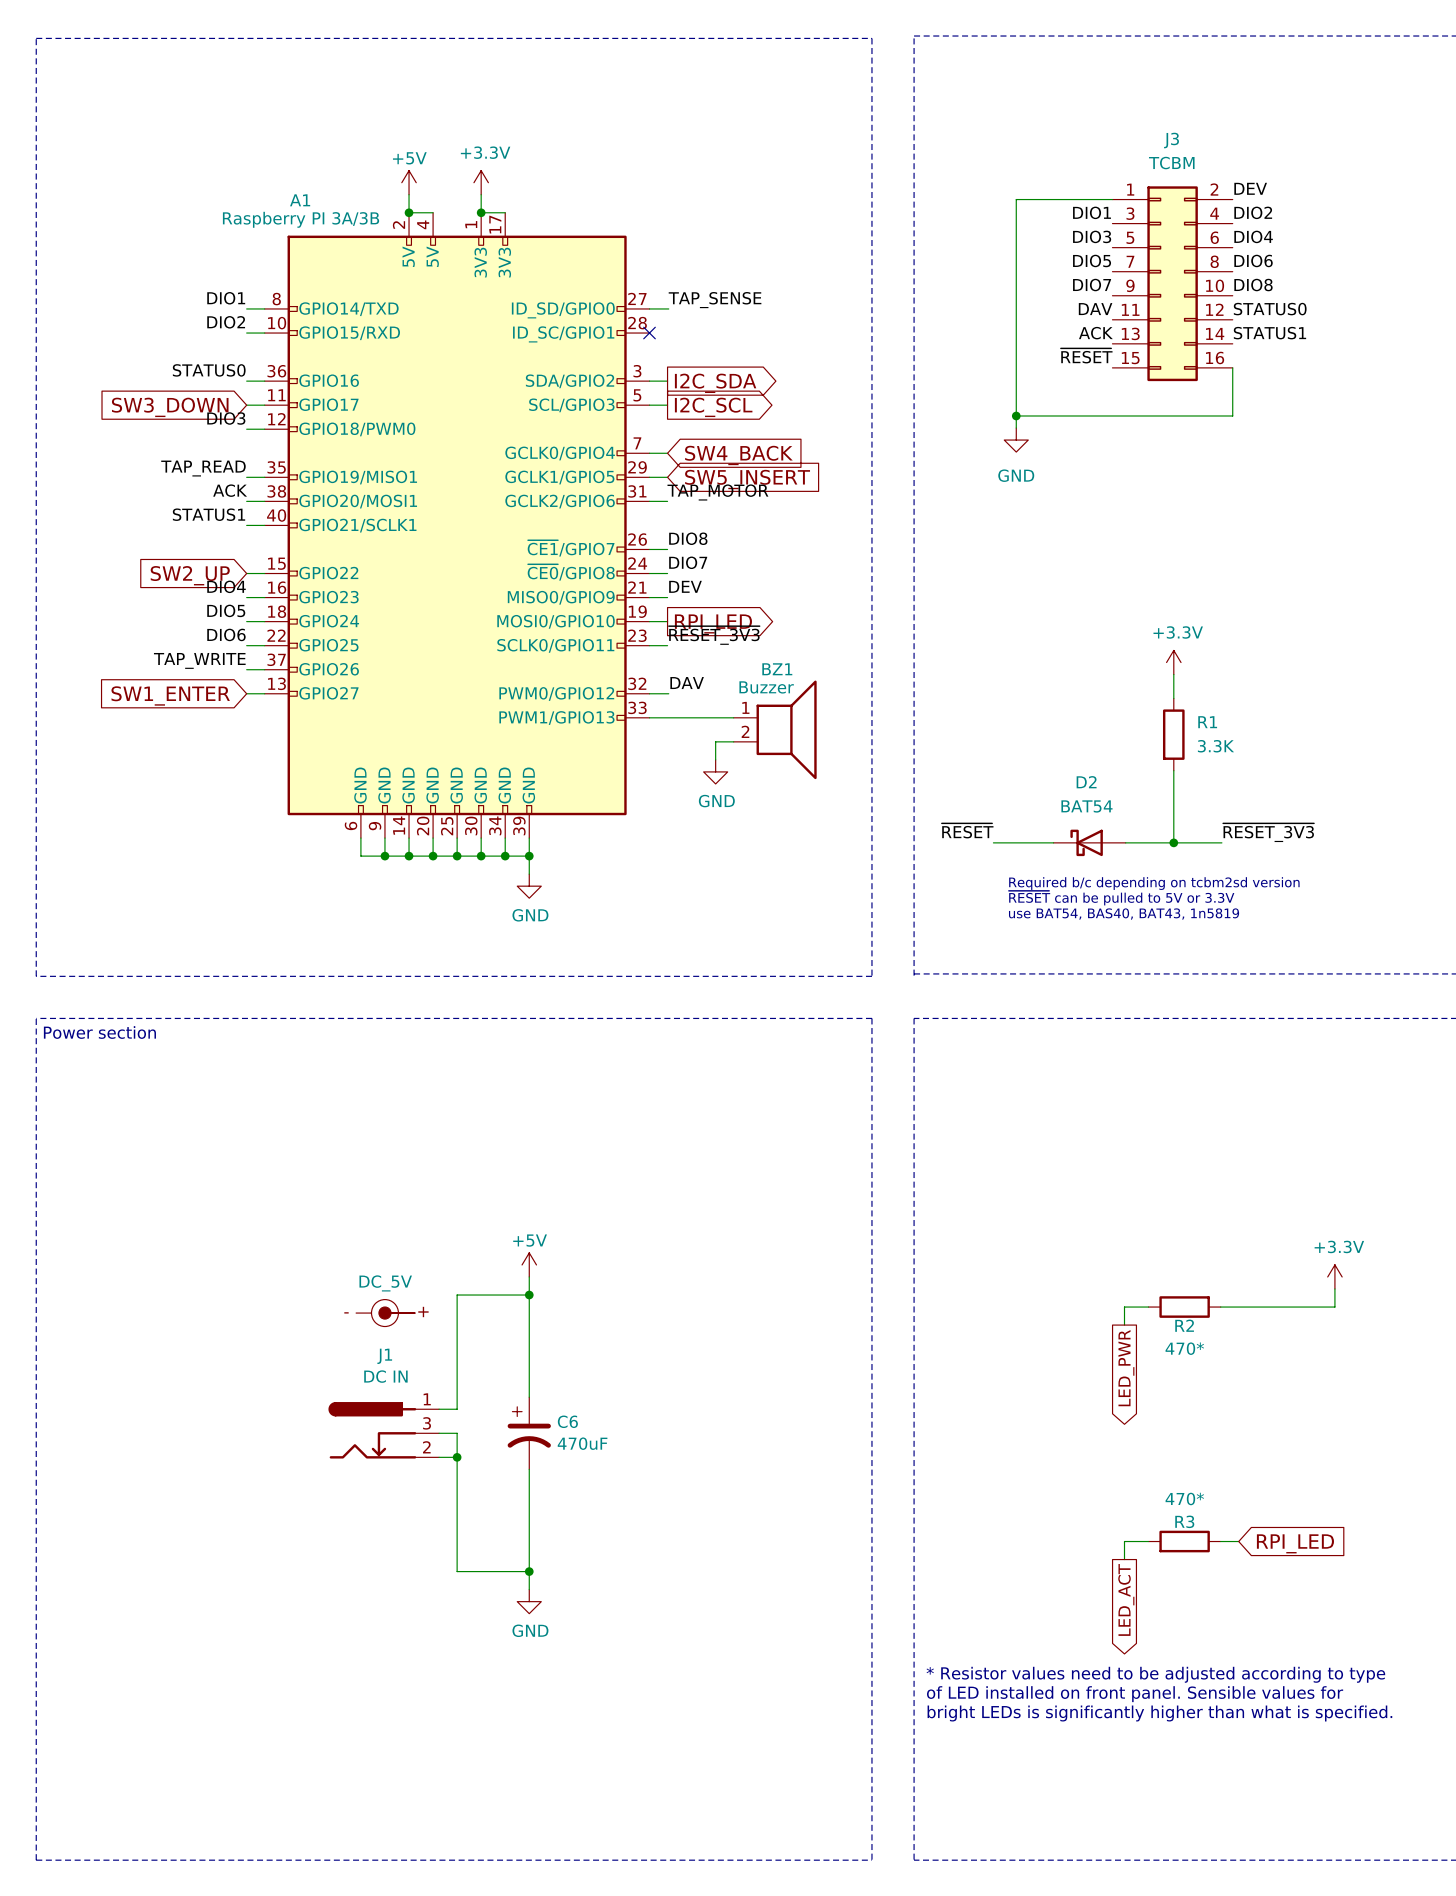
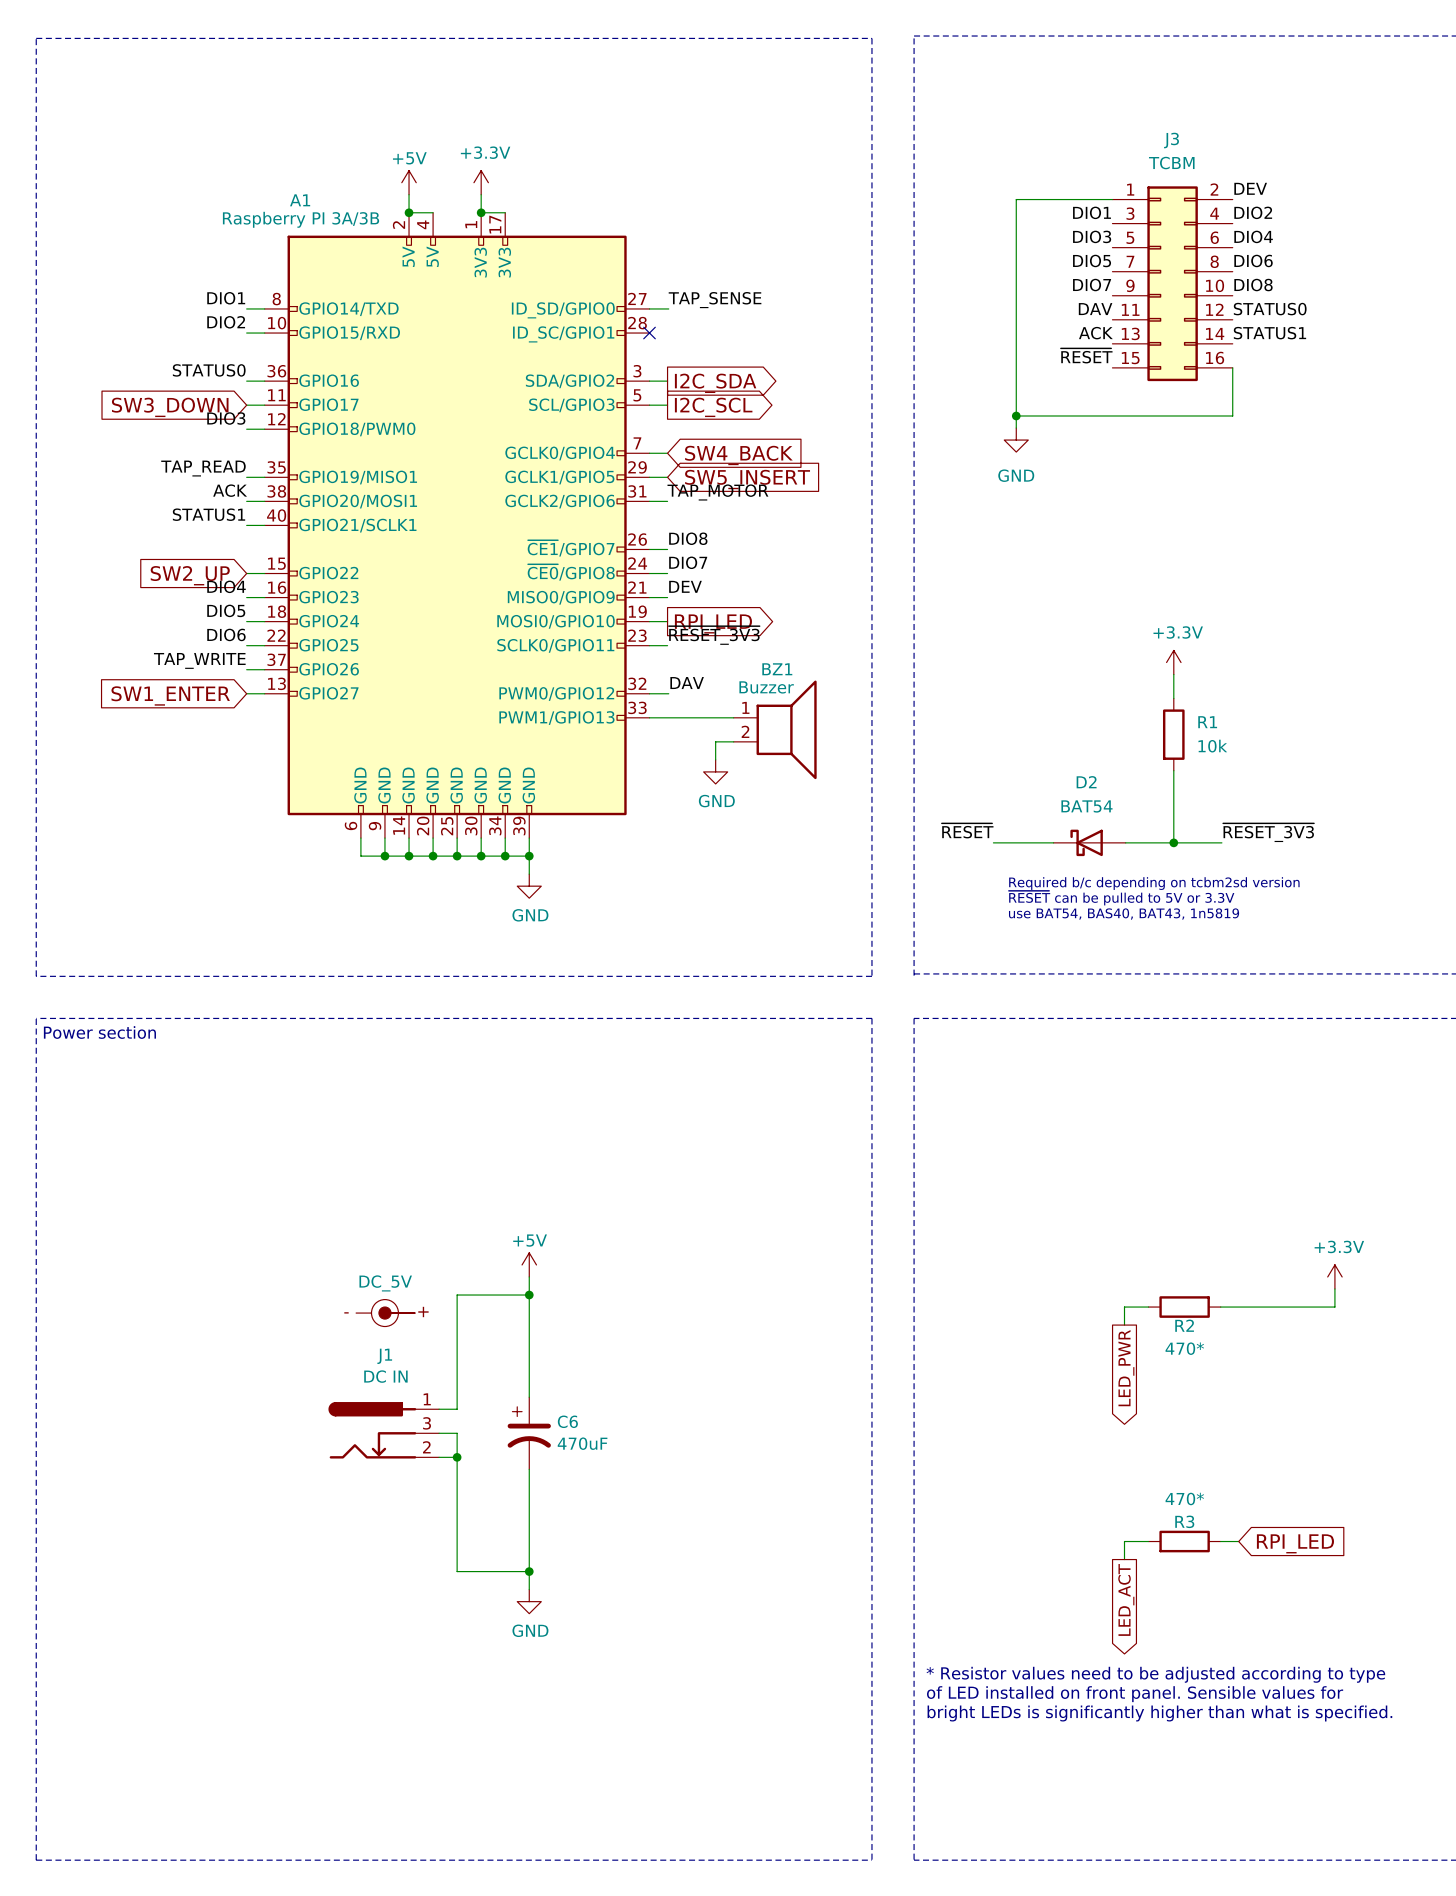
R1 value: 3.3K (1215, 746) -> 10k (1212, 746)

